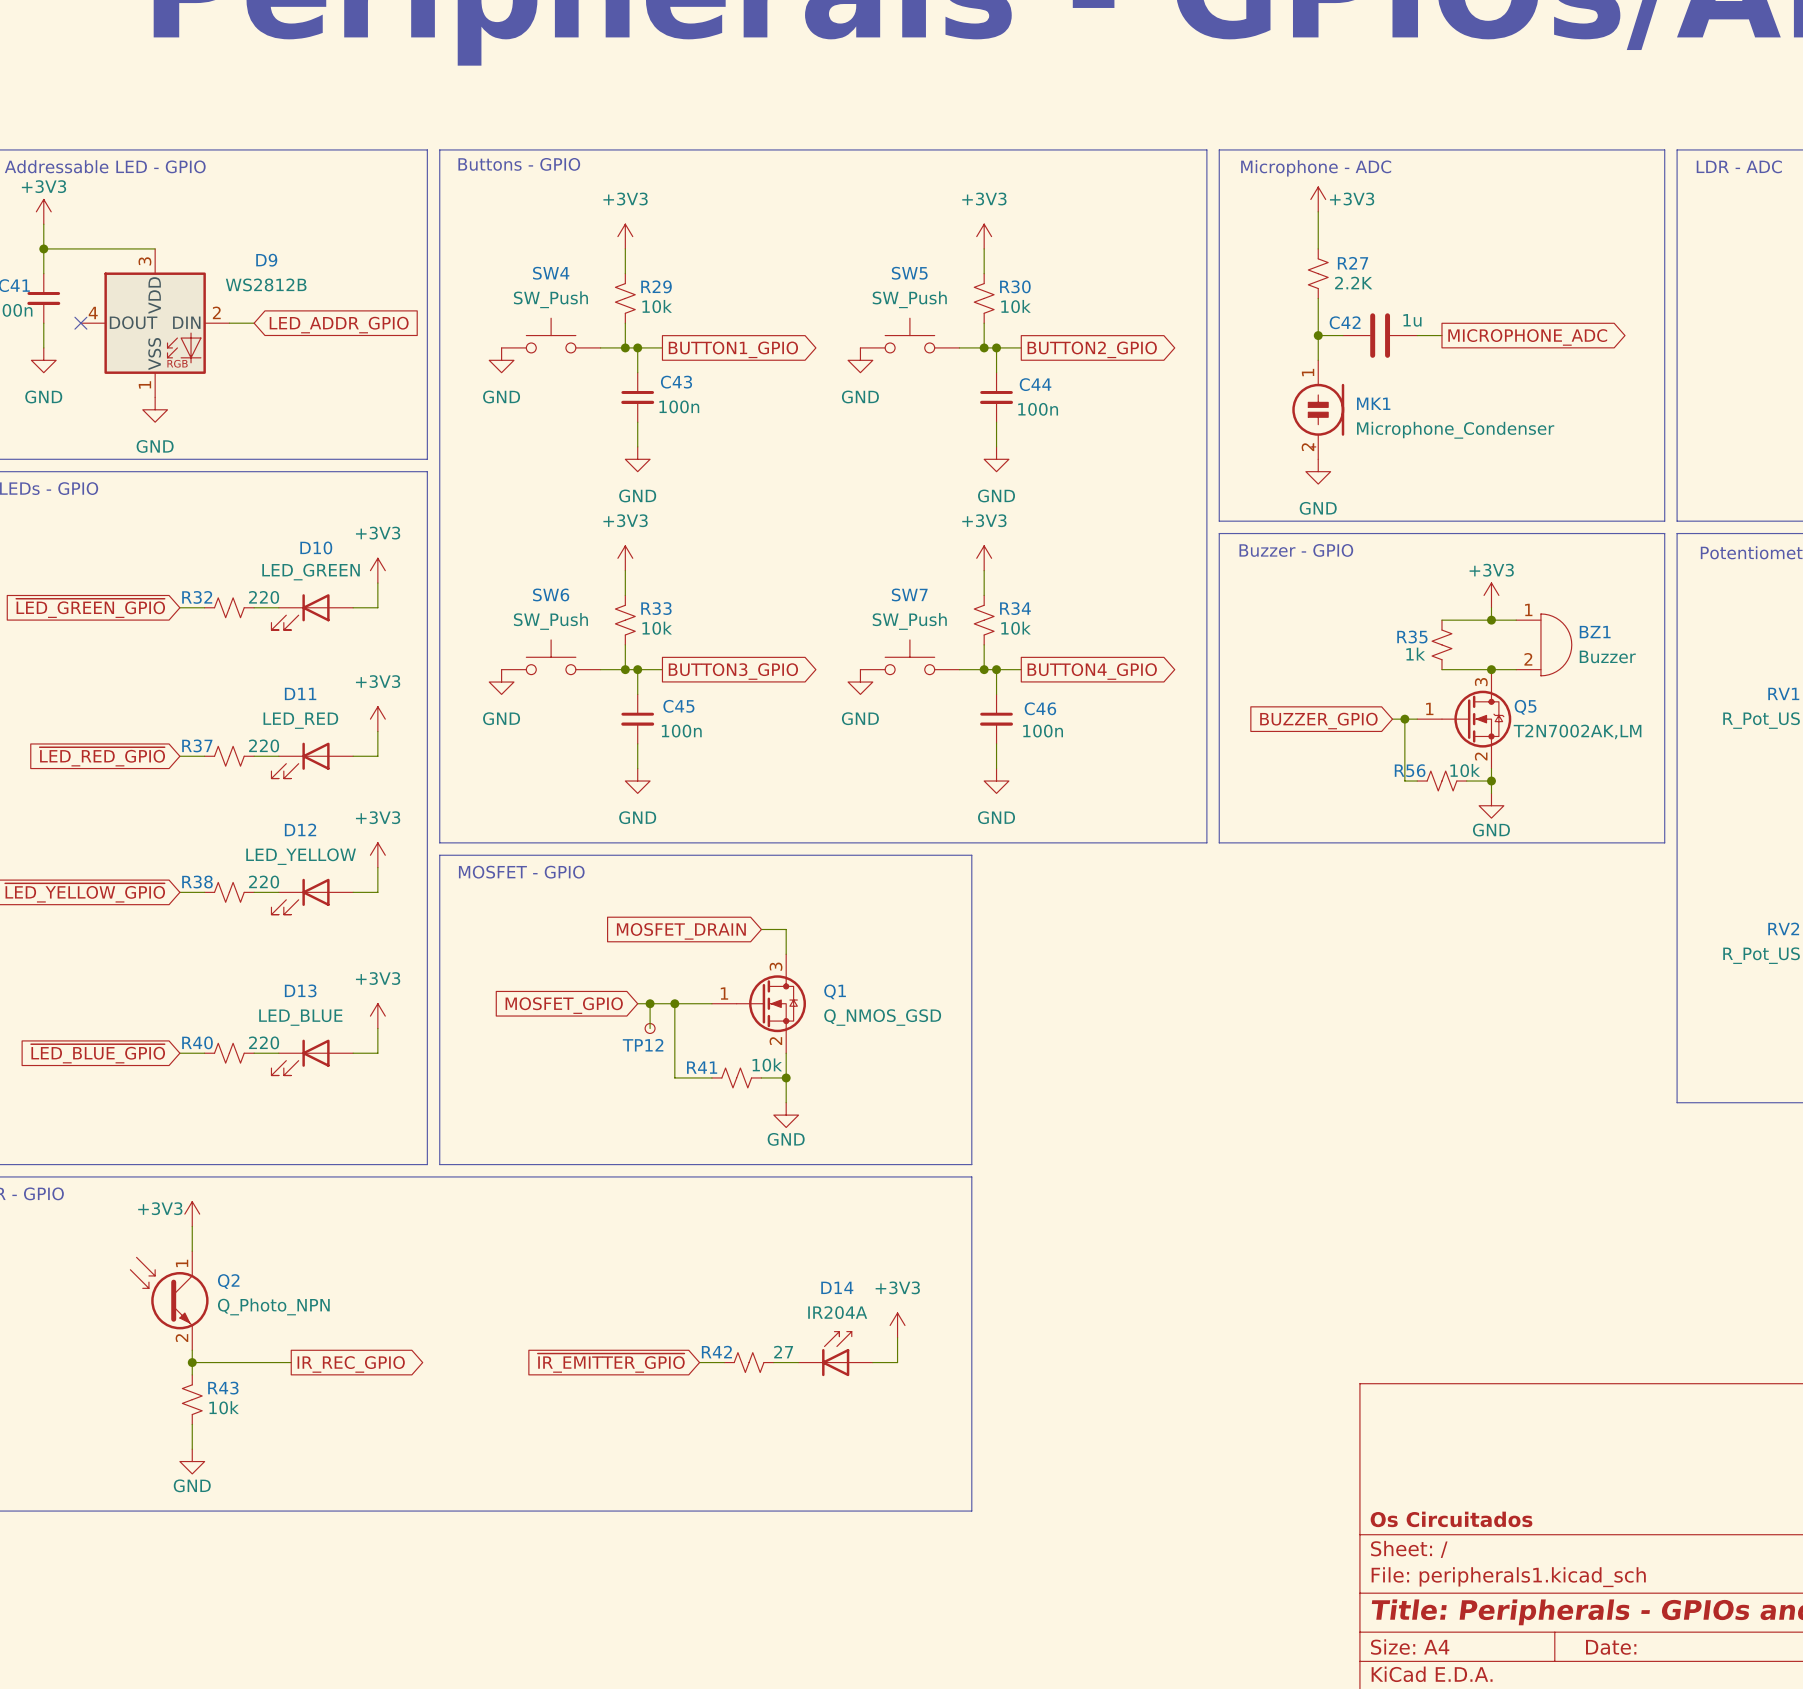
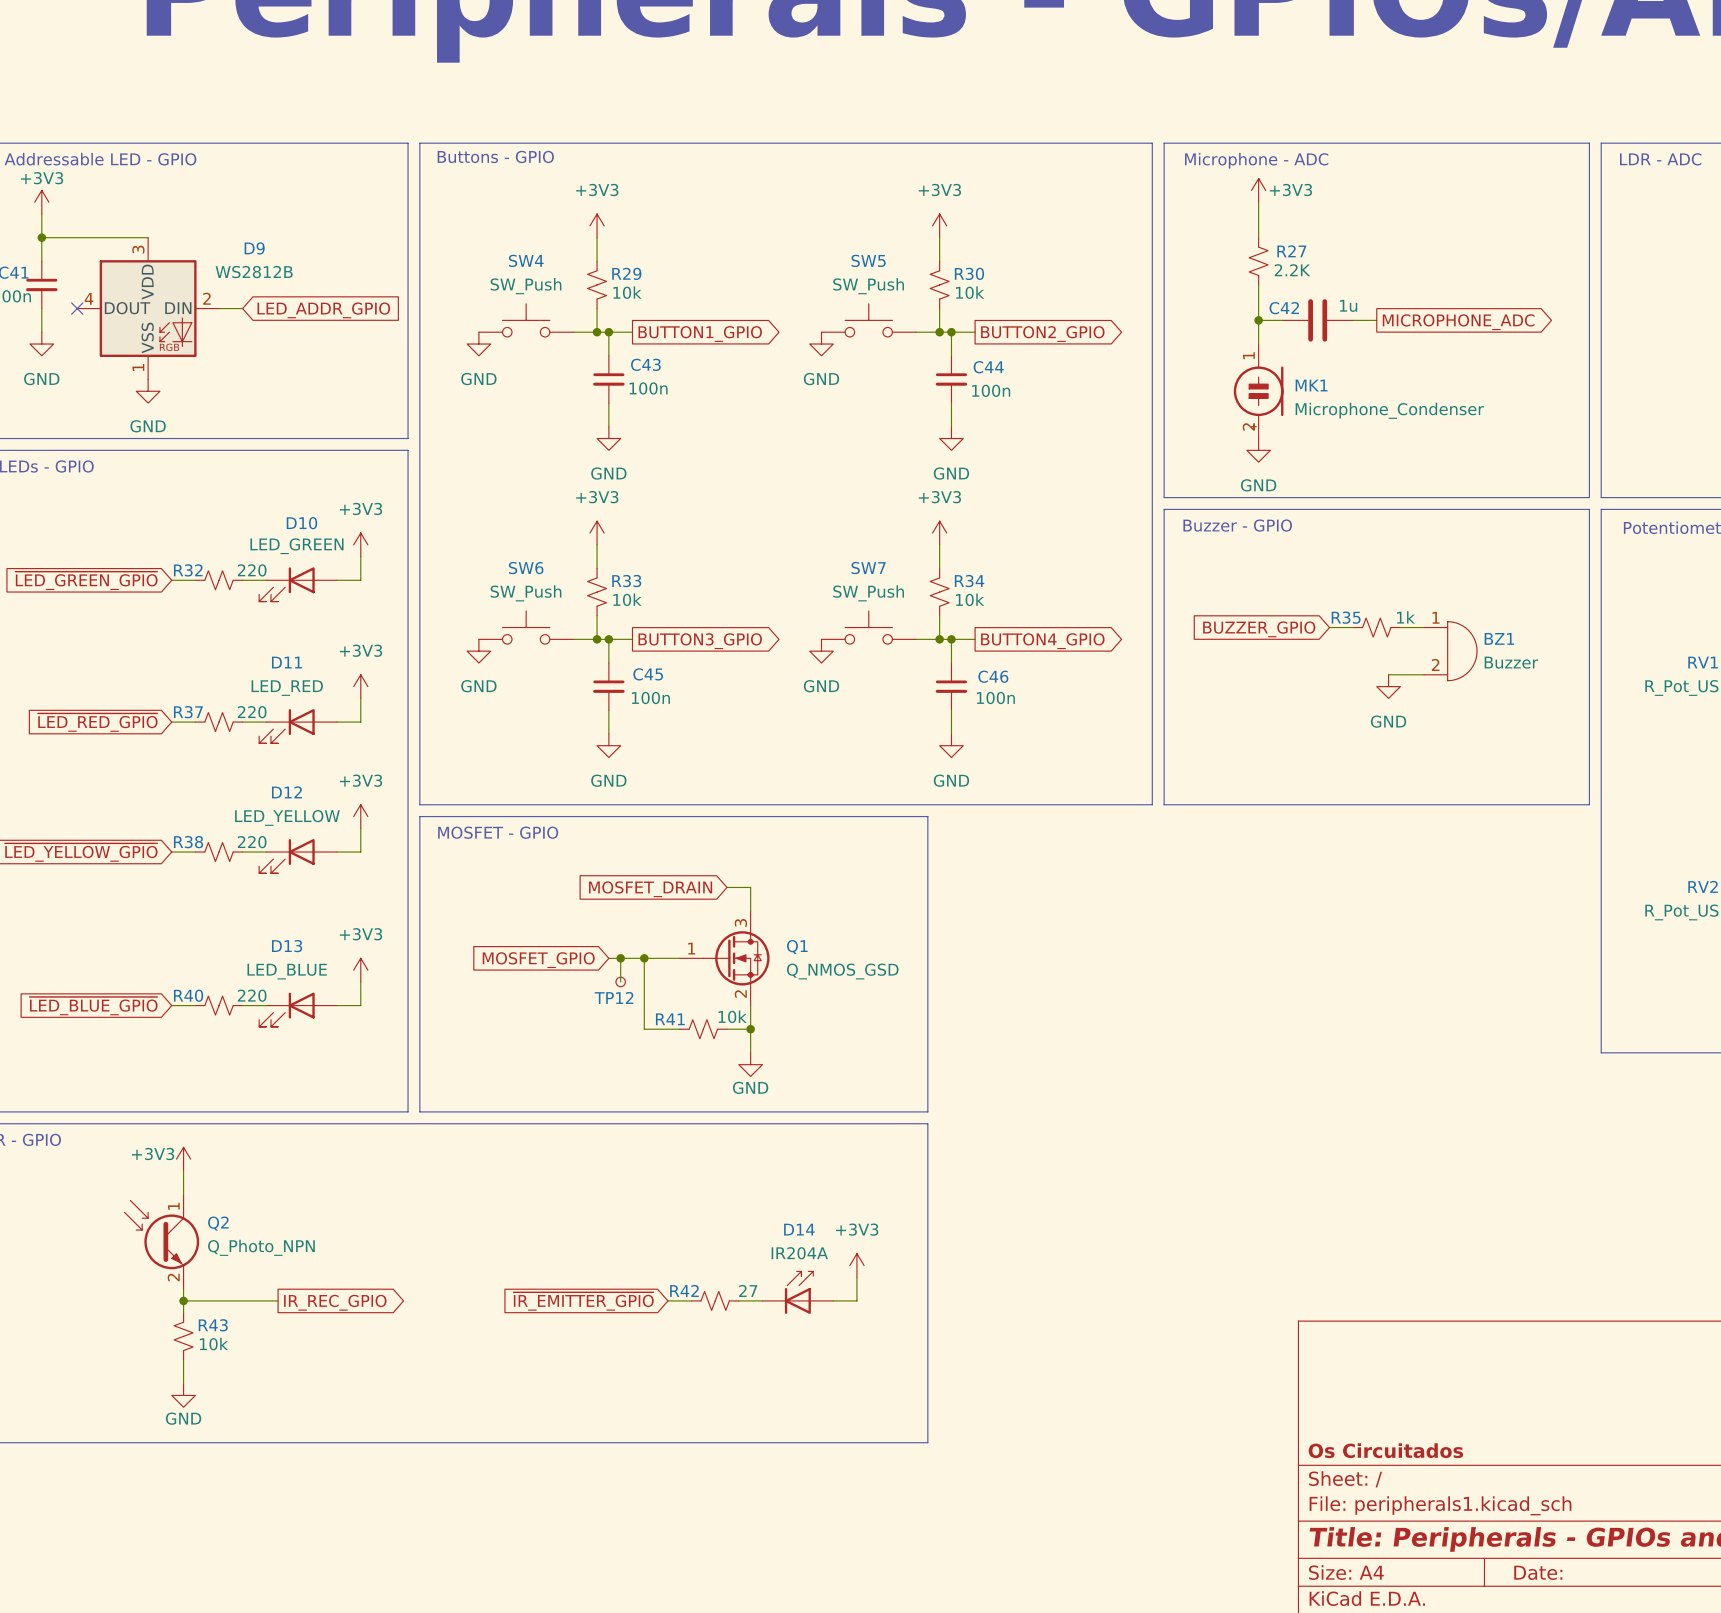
power symbol: +3V3 (1491, 595) -> none
wire: (1491, 607) (1491, 620) -> none
wire: (1441, 620) (1516, 620) -> none
junction: (1491, 620) -> none
R35 rotation: 0° (1441, 644) -> 90° clockwise (1376, 627)
BZ1 position: (1544, 644) -> (1450, 651)
R35 value position: 1k (1415, 654) -> 1k (1405, 617)
wire: (1441, 669) (1516, 669) -> none
junction: (1491, 669) -> none
wire: none -> (1388, 674) (1424, 674)
wire: (1392, 719) (1417, 719) -> (1329, 627) (1353, 627)
wire: (1404, 719) (1404, 781) (1417, 781) -> none
junction: (1404, 719) -> none
Q5: T2N7002AK,LM (1464, 719) -> none
global label position: BUZZER_GPIO (1318, 721) -> BUZZER_GPIO (1259, 629)
wire: (1491, 768) (1491, 793) -> none
R56: 10k (1441, 781) -> none
wire: (1466, 781) (1491, 781) -> (1400, 627) (1424, 627)
junction: (1491, 781) -> none
power symbol position: GND (1491, 805) -> GND (1388, 686)
power symbol text position: GND (1491, 830) -> GND (1388, 721)

